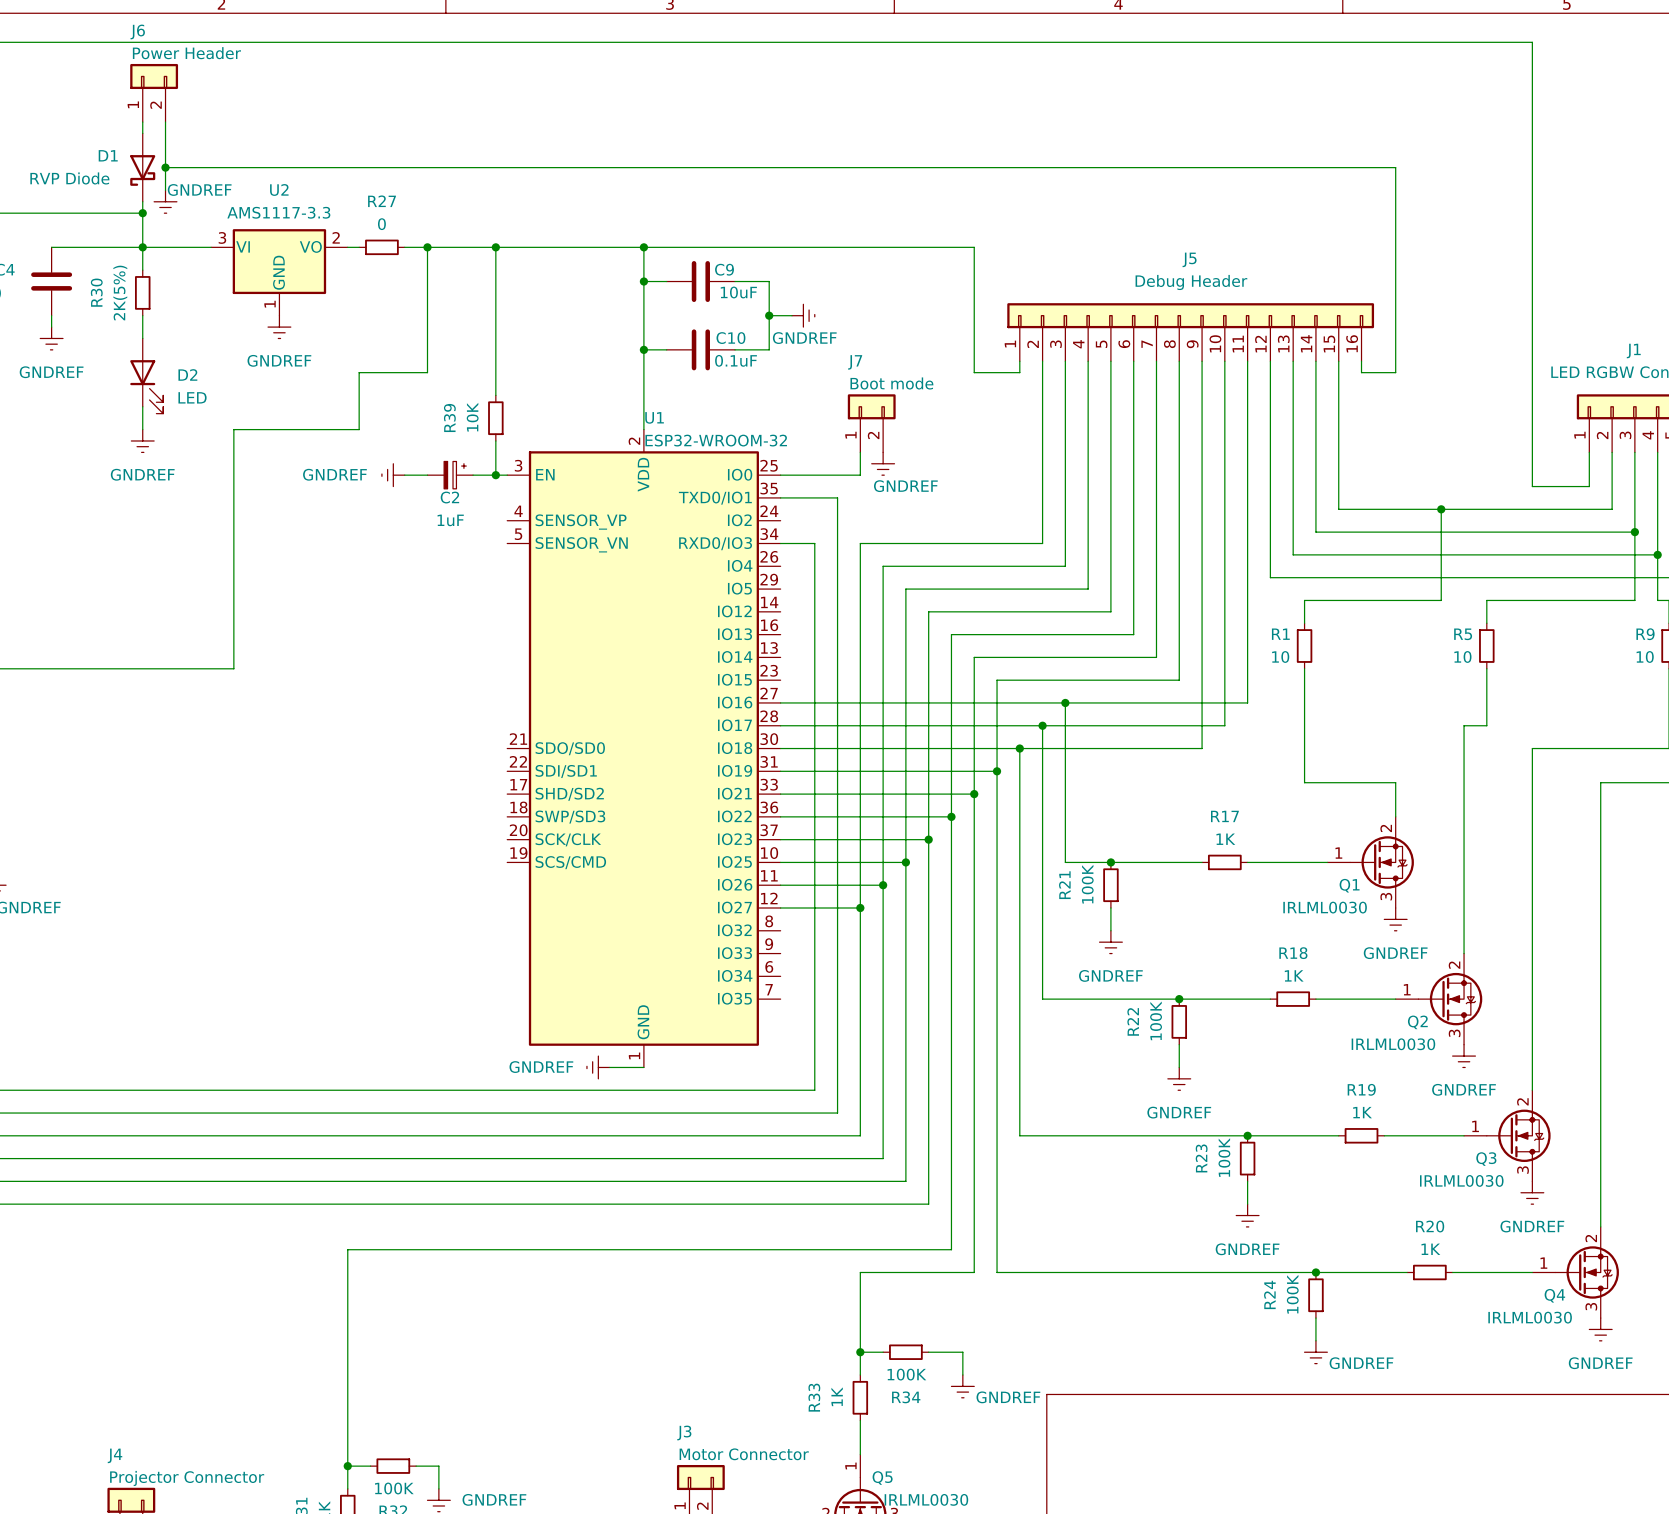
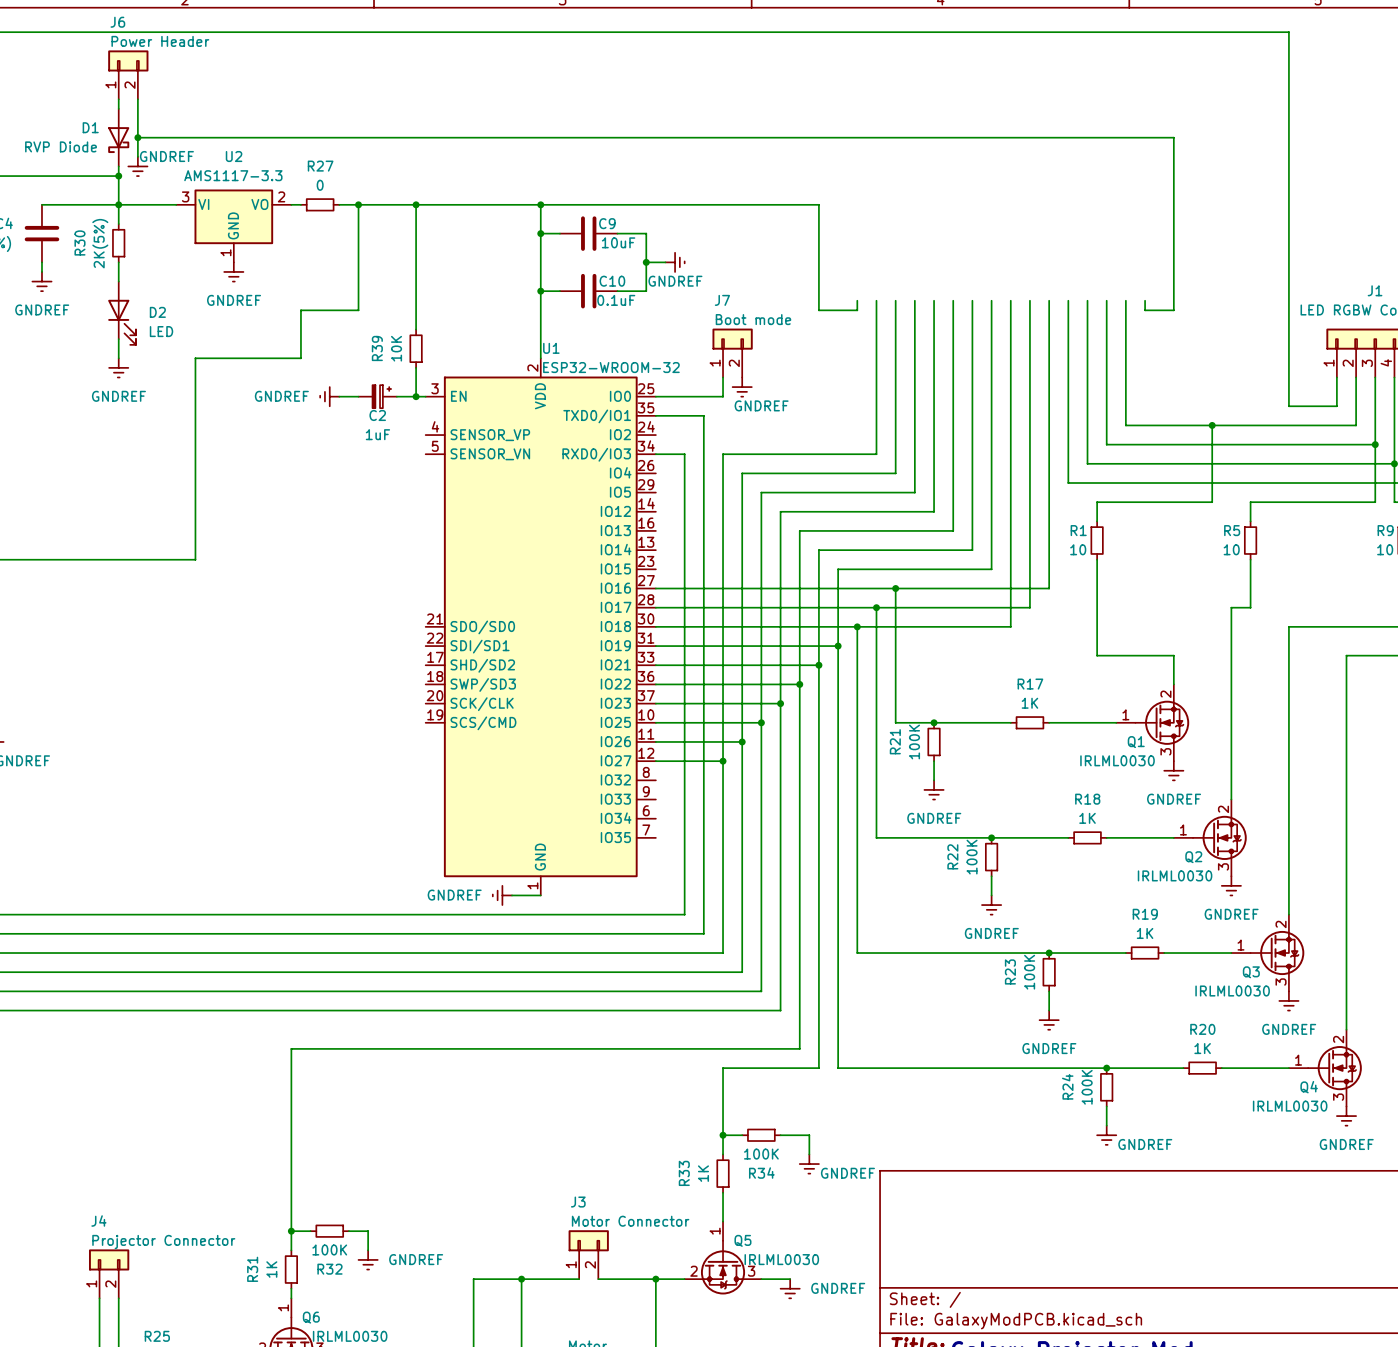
J5: Debug Header (1190, 332) -> none

